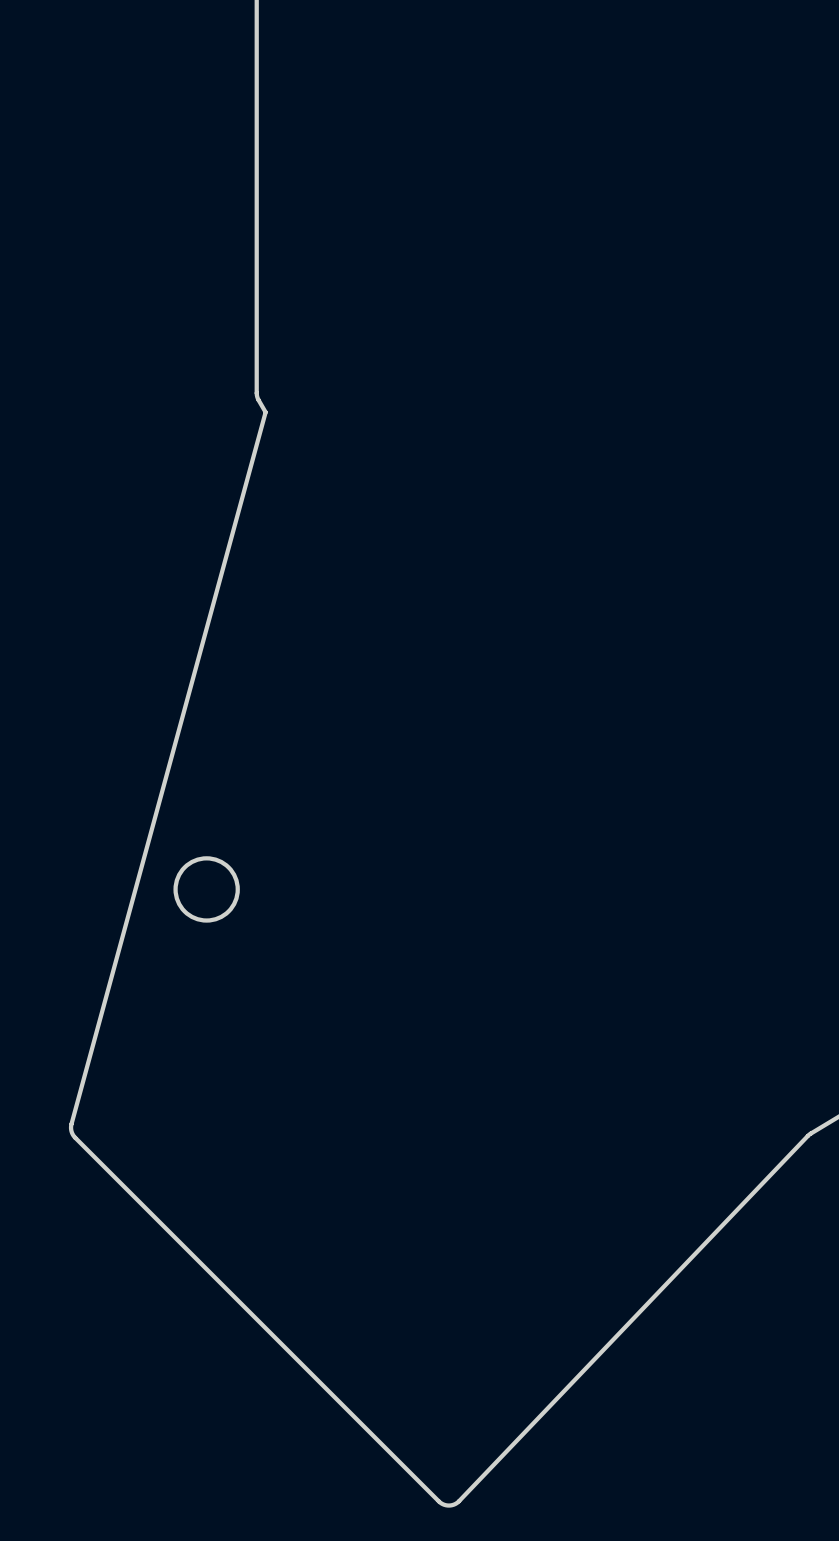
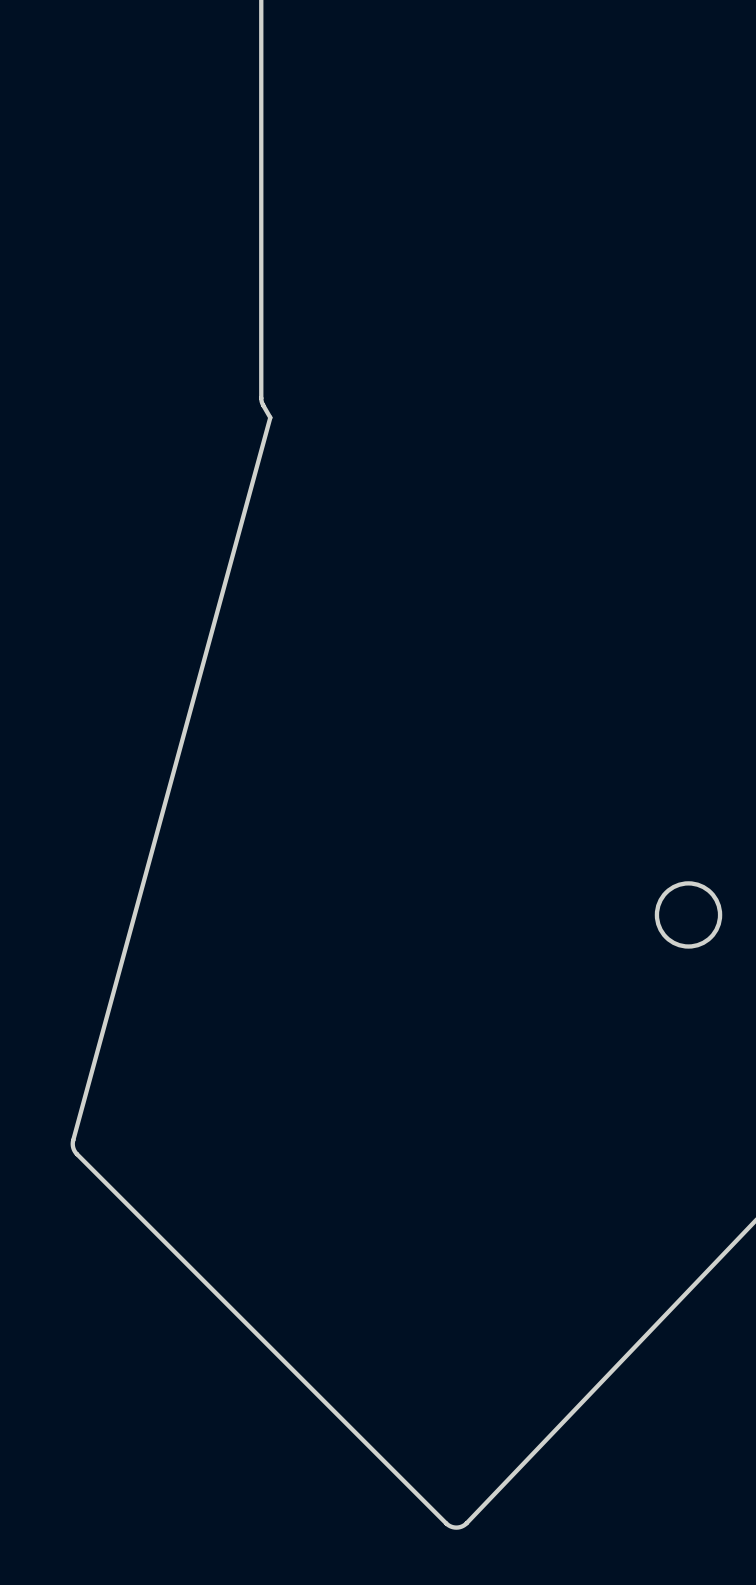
round board edge position: (206, 889) -> (688, 914)

